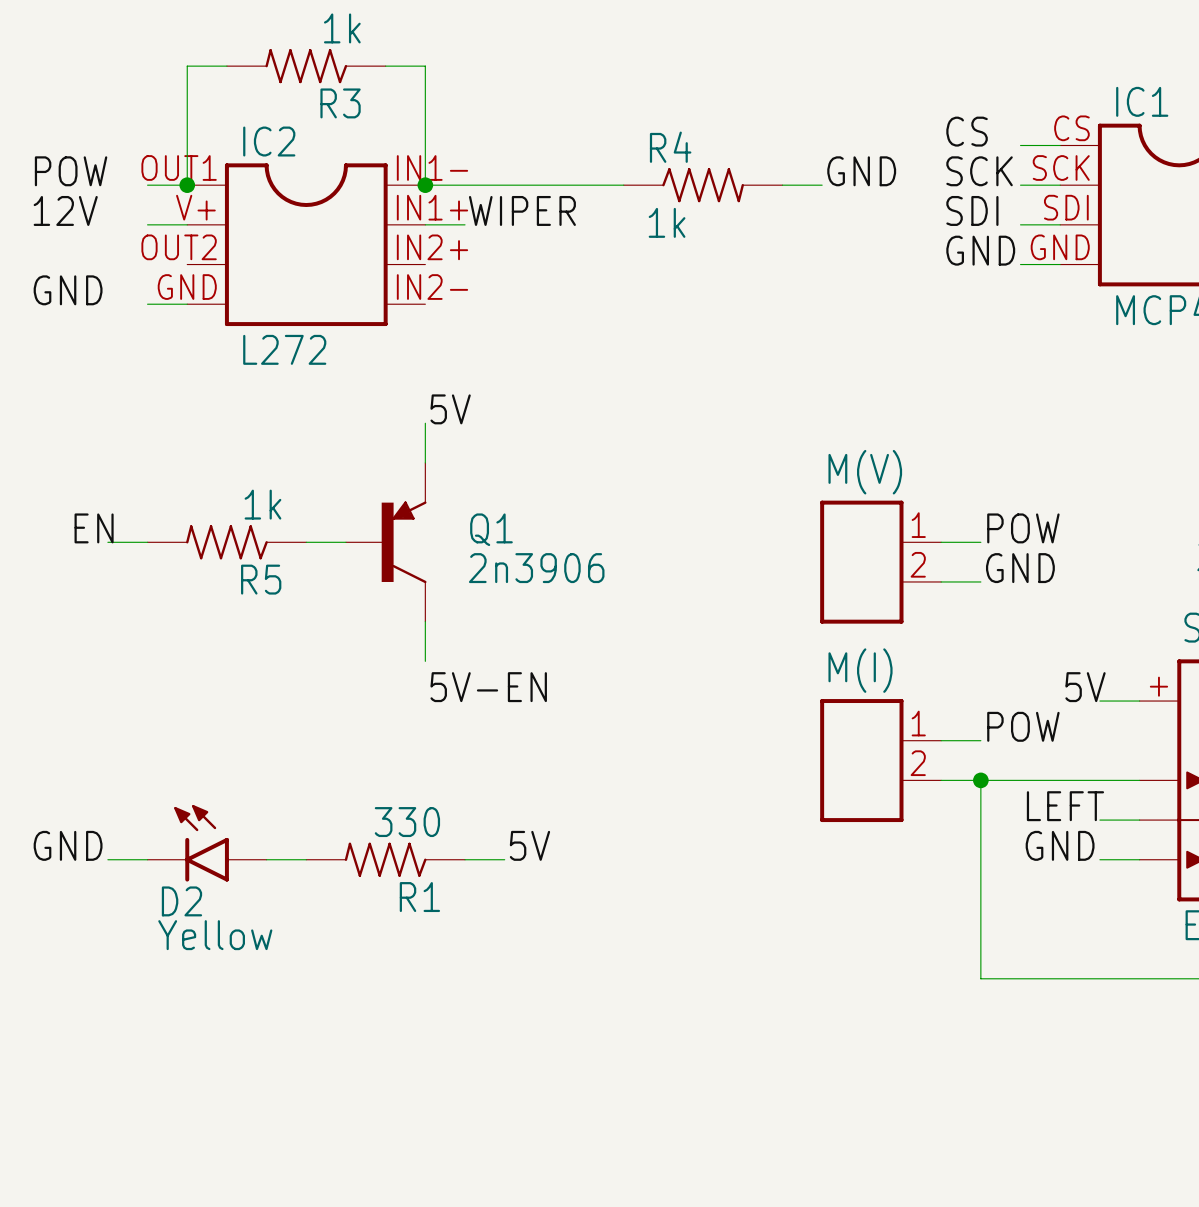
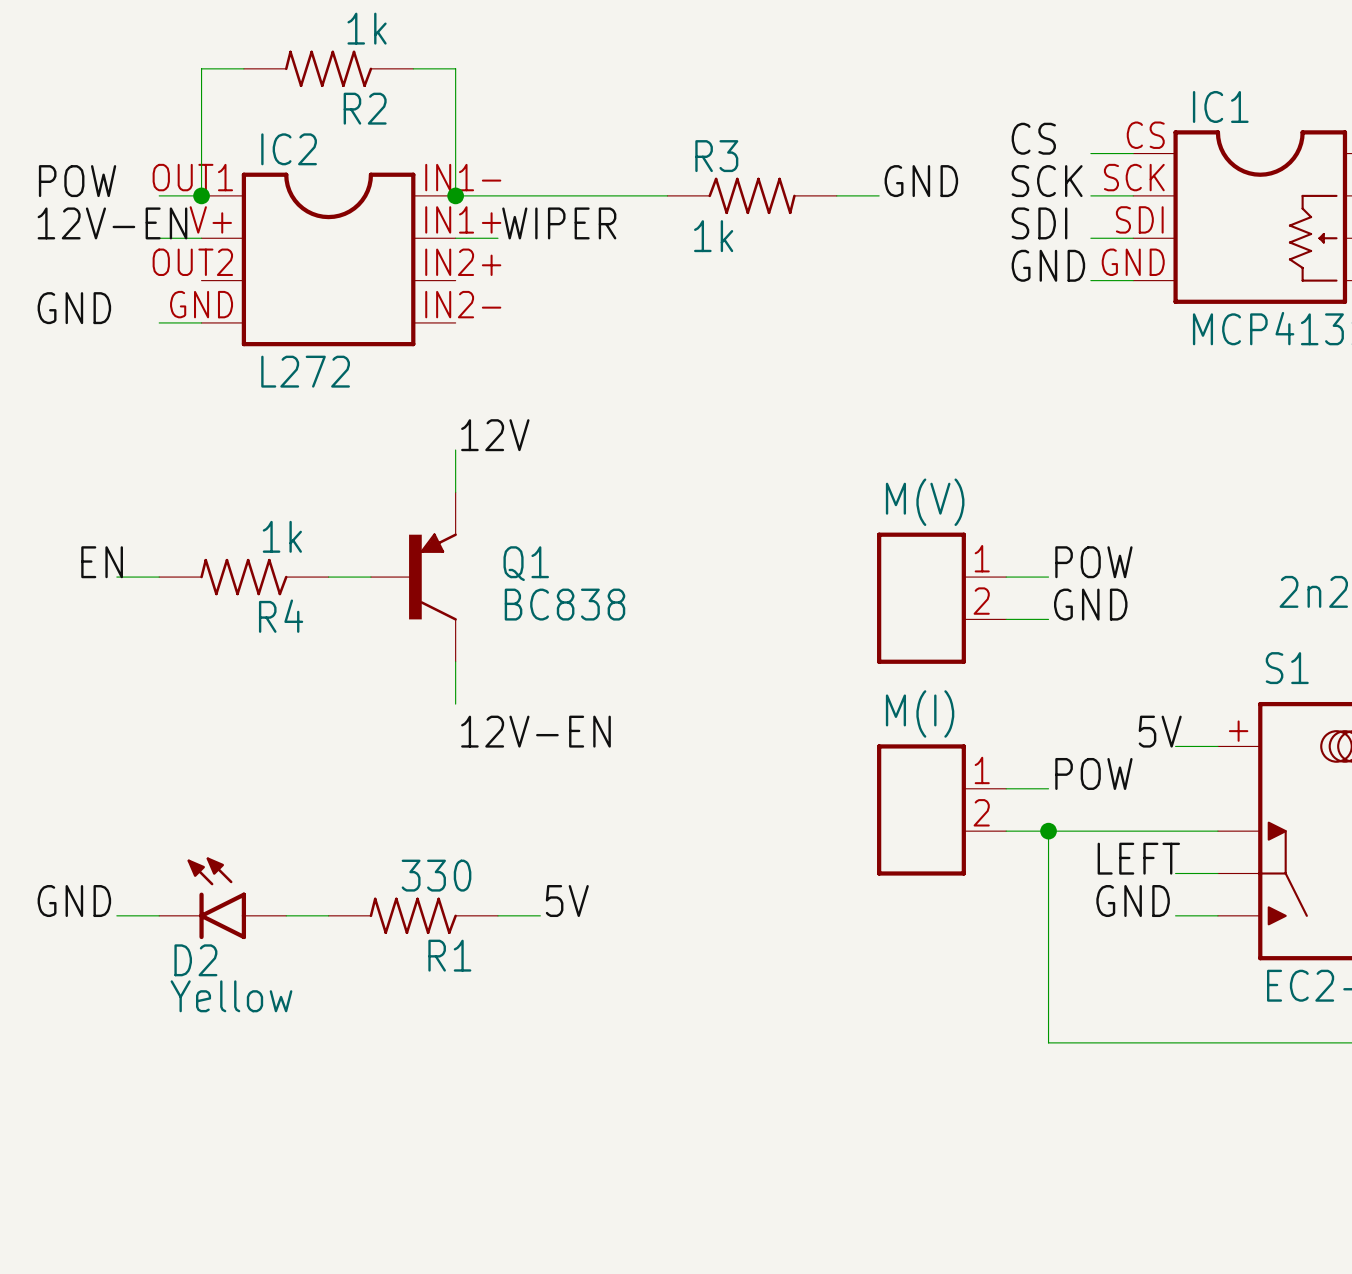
R3 name: R3 (340, 103) -> R2 (365, 108)
R4 name: R4 (670, 147) -> R3 (716, 156)
label: 12V (65, 210) -> 12V-EN (112, 223)
label: 5V (450, 409) -> 12V (495, 435)
Q1 value: 2n3906 (536, 568) -> BC838 (564, 604)
R5 name: R5 (261, 579) -> R4 (281, 616)
label: 5V-EN (488, 687) -> 12V-EN (535, 731)

